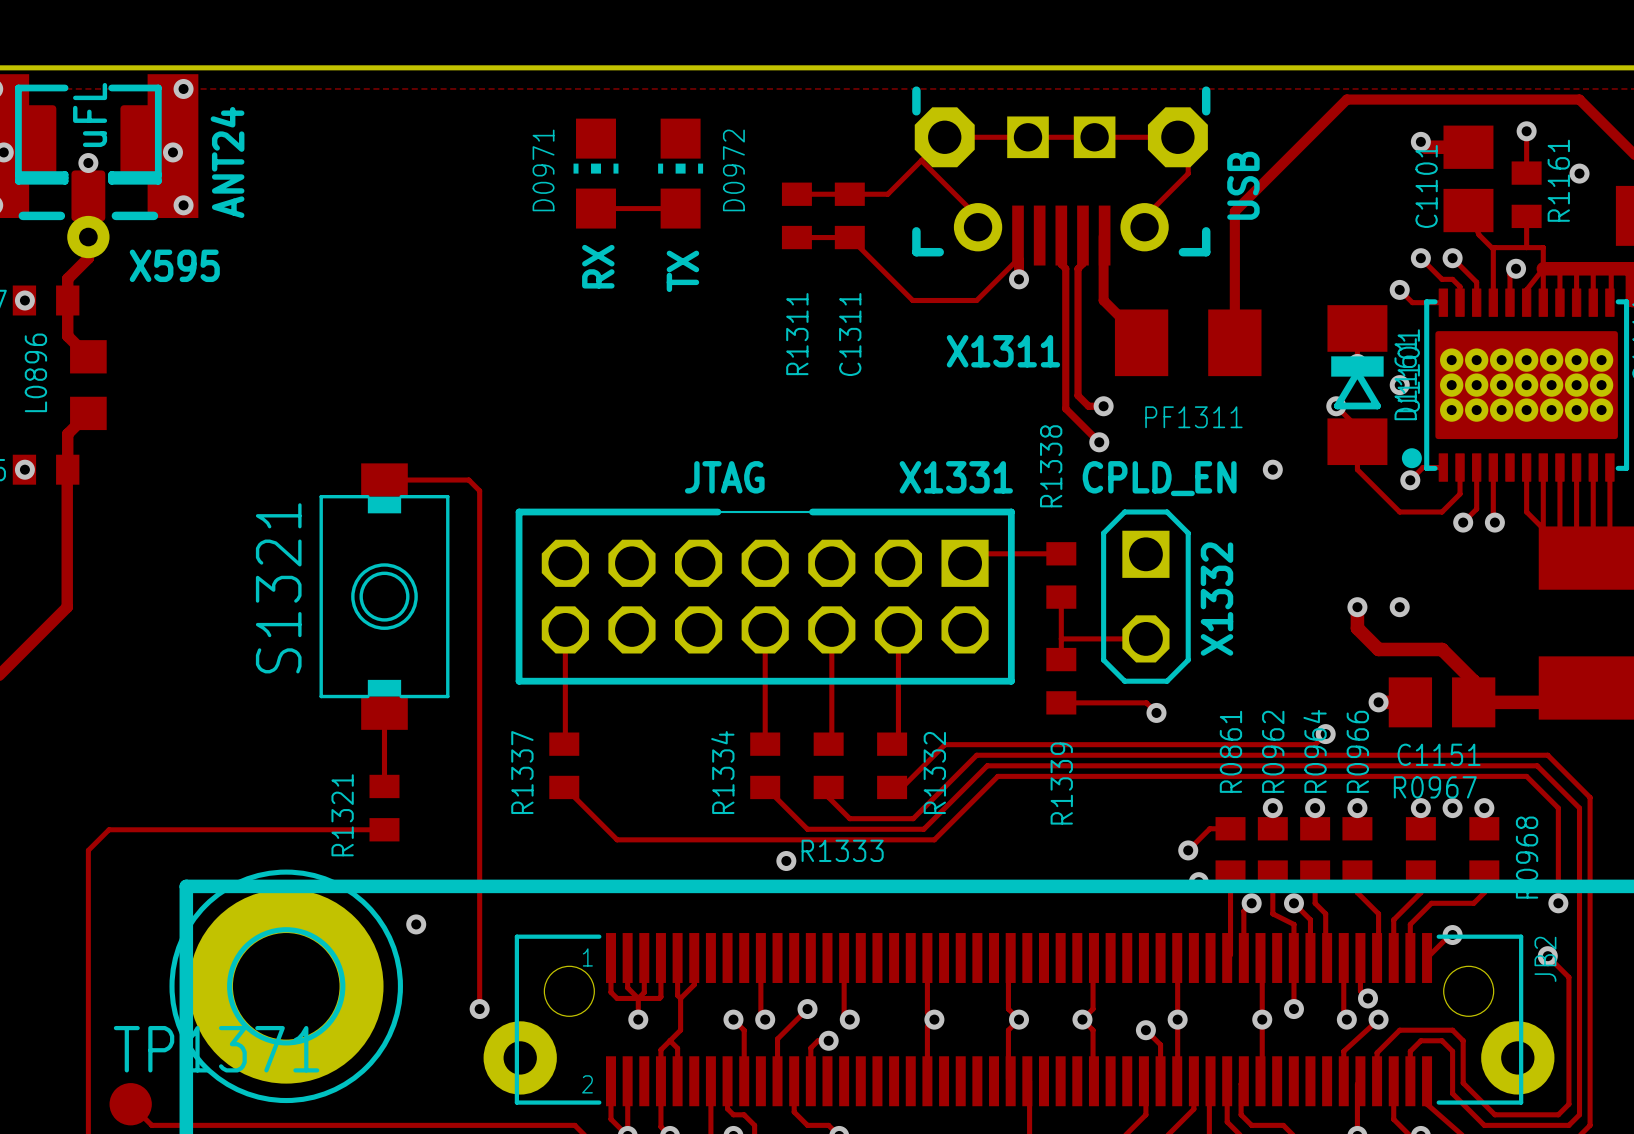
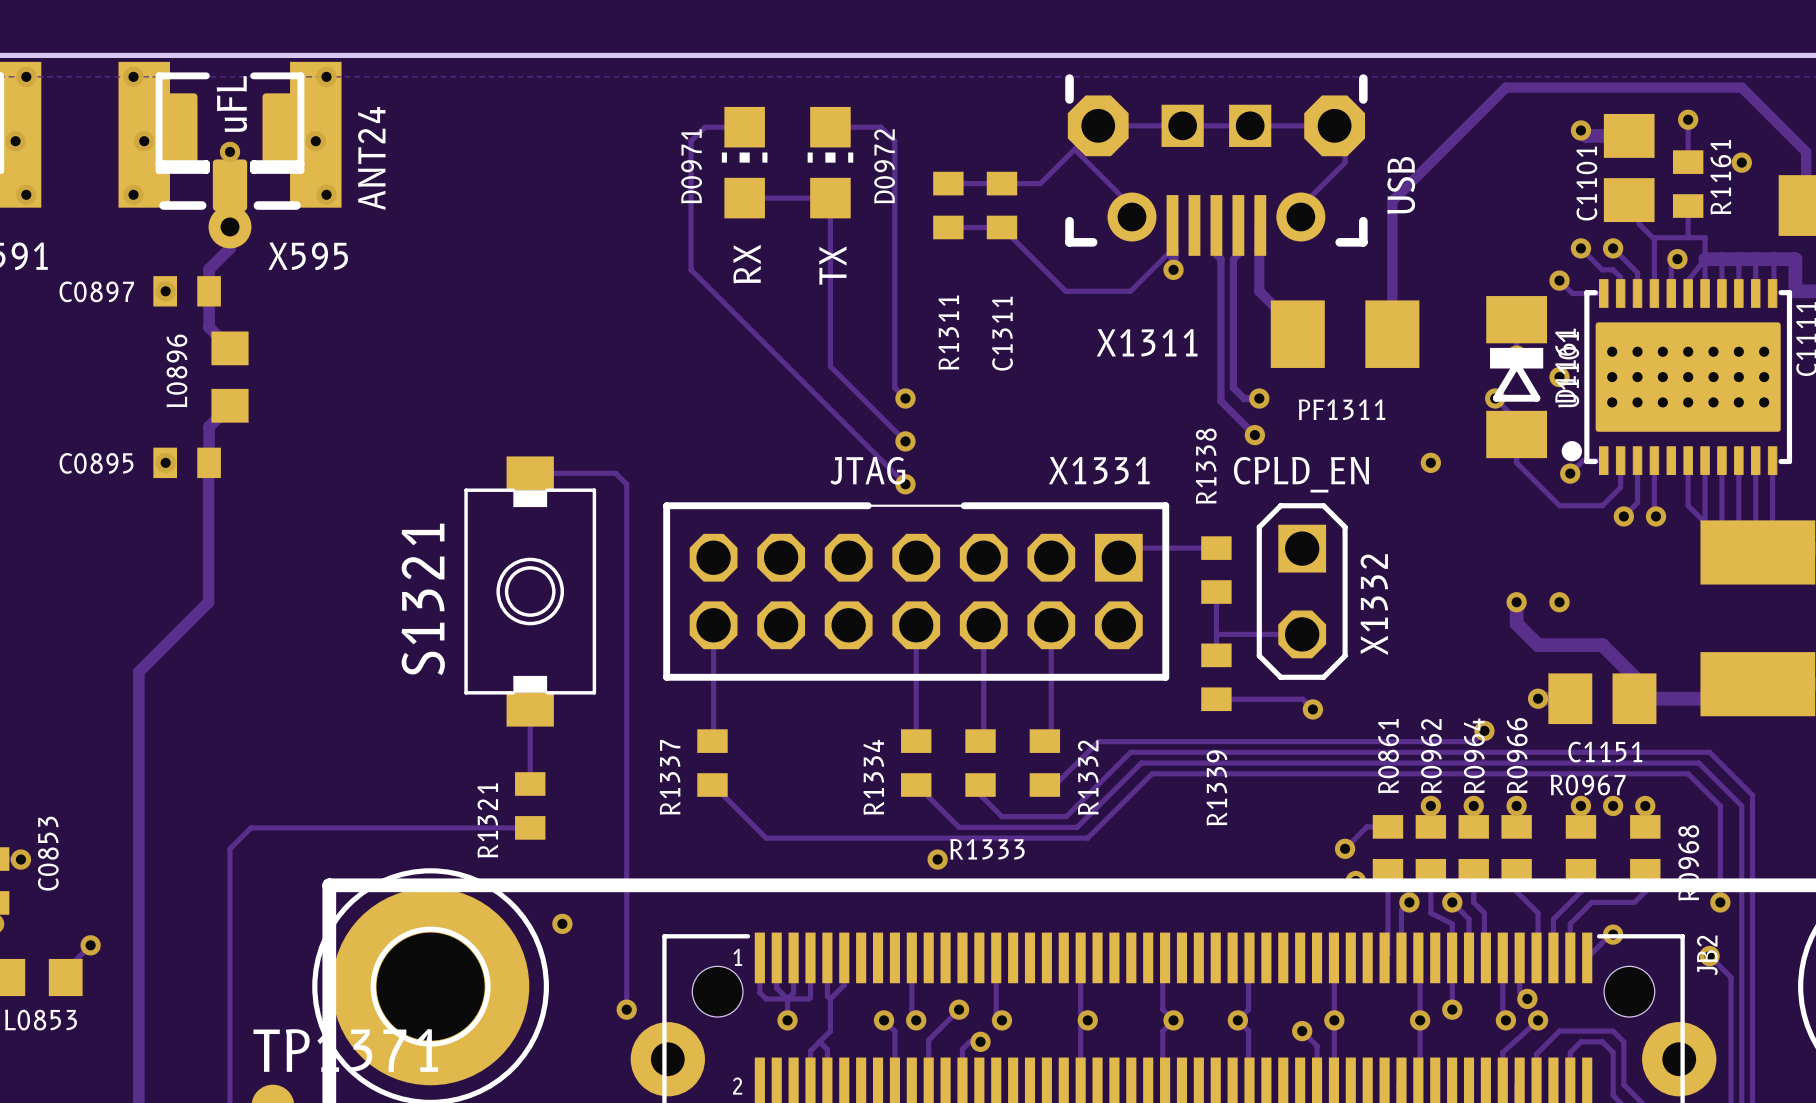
track: none -> (744, 127) (705, 127) (691, 141) (691, 269) (905, 484)
track: none -> (830, 127) (880, 127) (894, 141) (894, 387) (905, 398)
track: none -> (830, 198) (830, 366) (905, 441)
via: none -> (905, 398)
via: none -> (905, 441)
via: none -> (905, 484)

